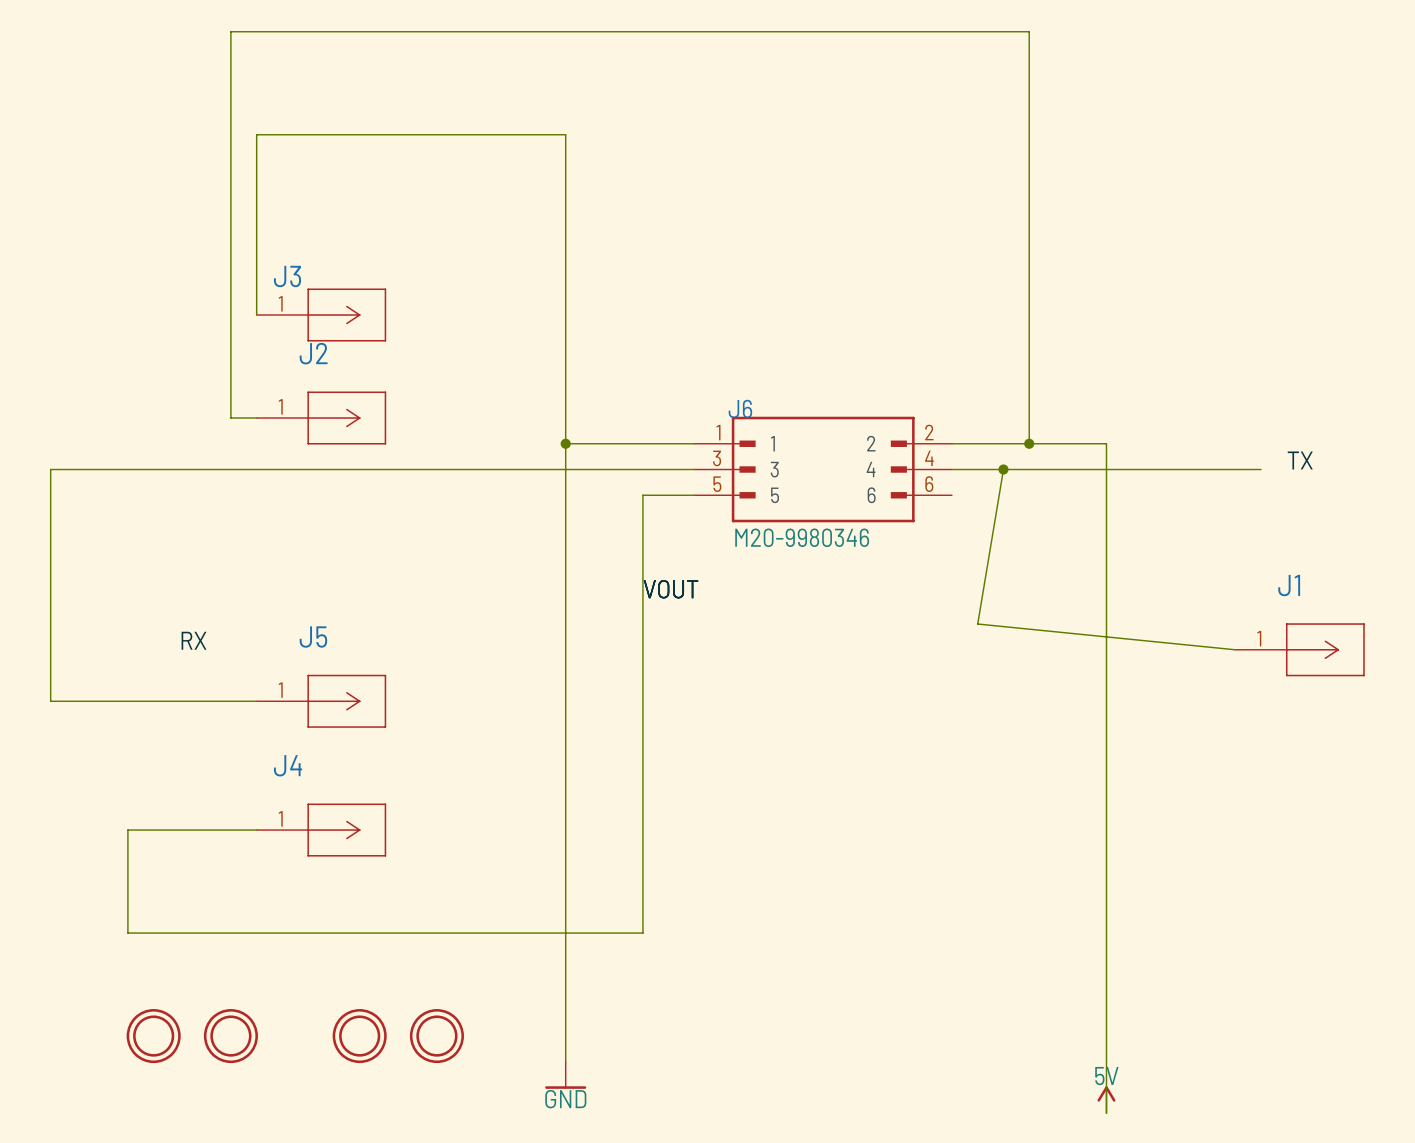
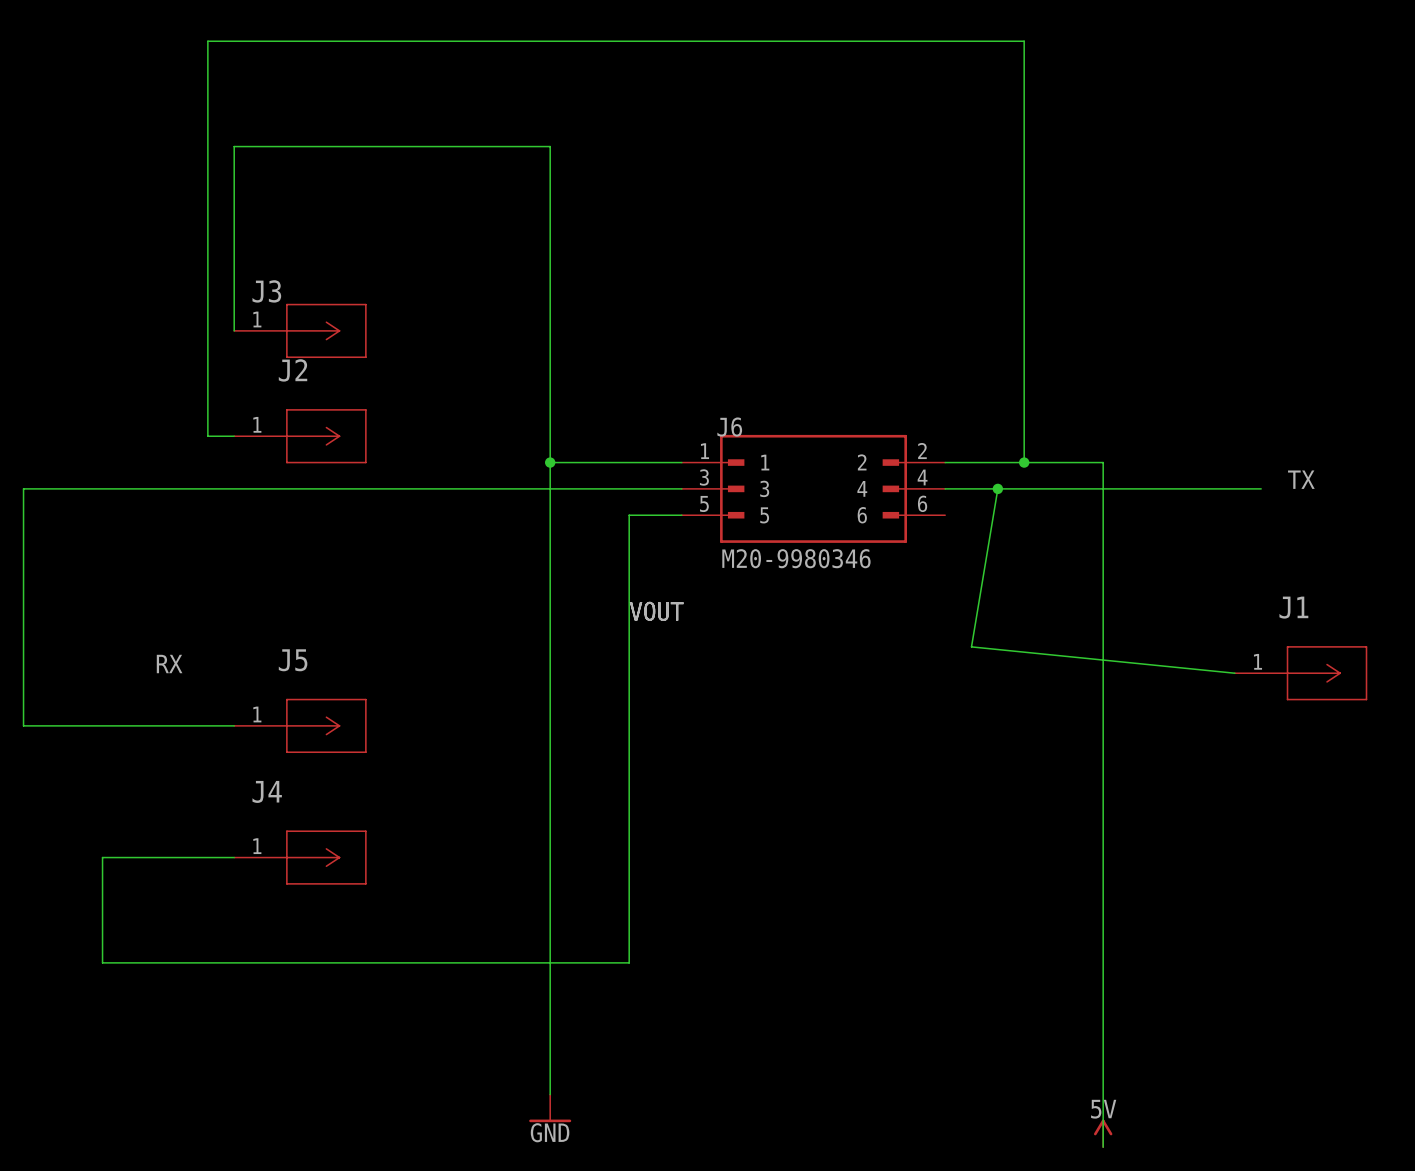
part: (153, 1036) -> none
part: (230, 1036) -> none
part: (359, 1036) -> none
part: (436, 1036) -> none

